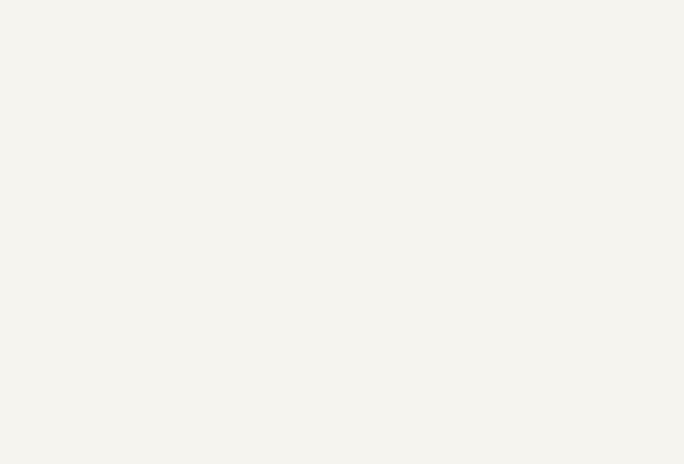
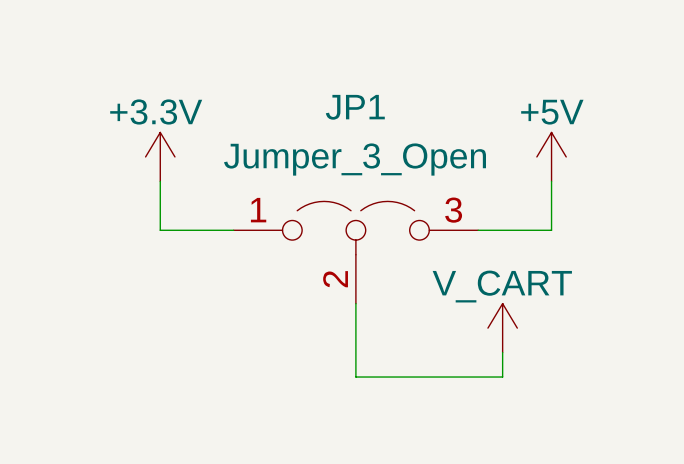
power symbol: none -> +3.3V (160, 156)
power symbol: none -> +5V (551, 156)
wire: none -> (160, 181) (160, 230) (233, 230)
wire: none -> (551, 181) (551, 230) (478, 230)
JP1: none -> Jumper_3_Open (355, 252)
wire: none -> (355, 303) (355, 377) (502, 377) (502, 352)
power symbol: none -> V_CART (502, 328)

